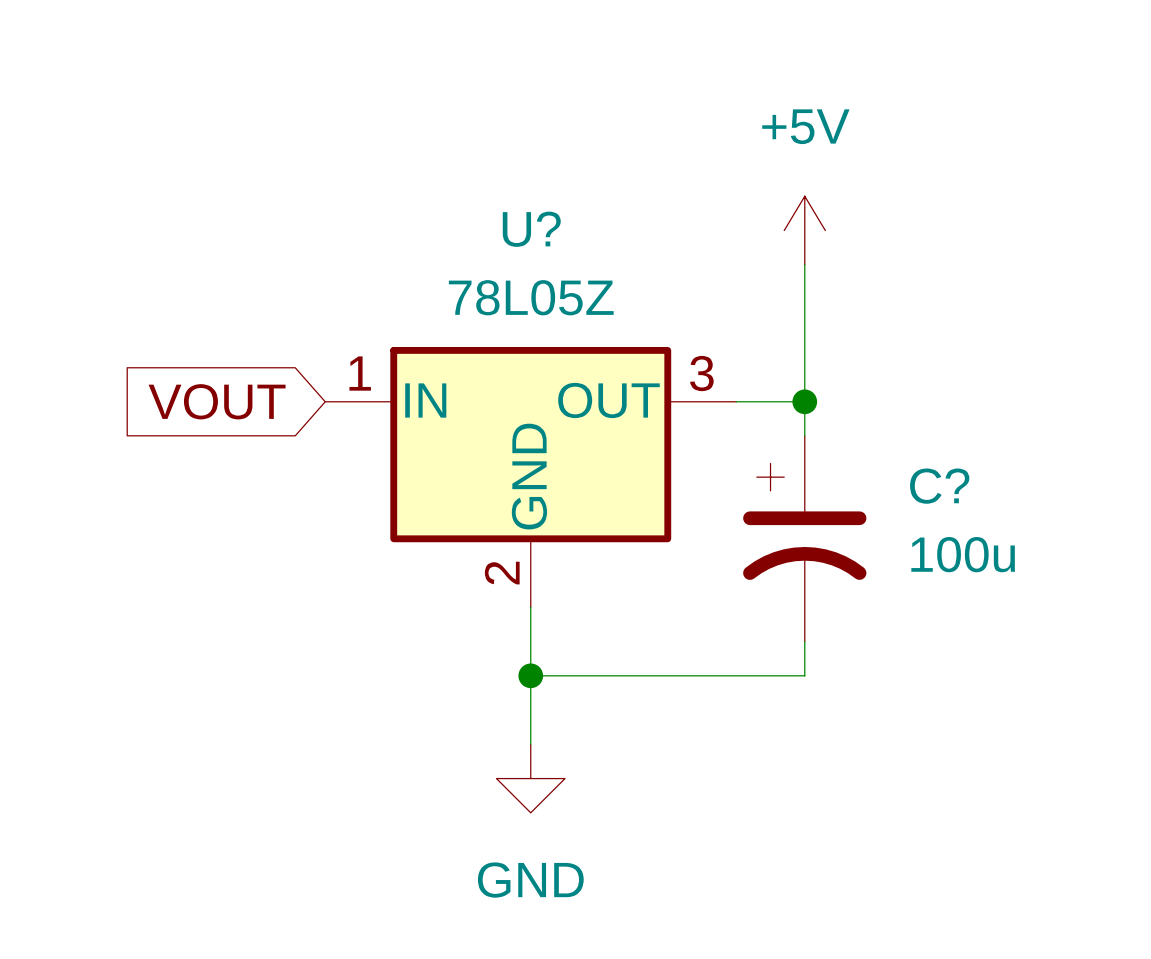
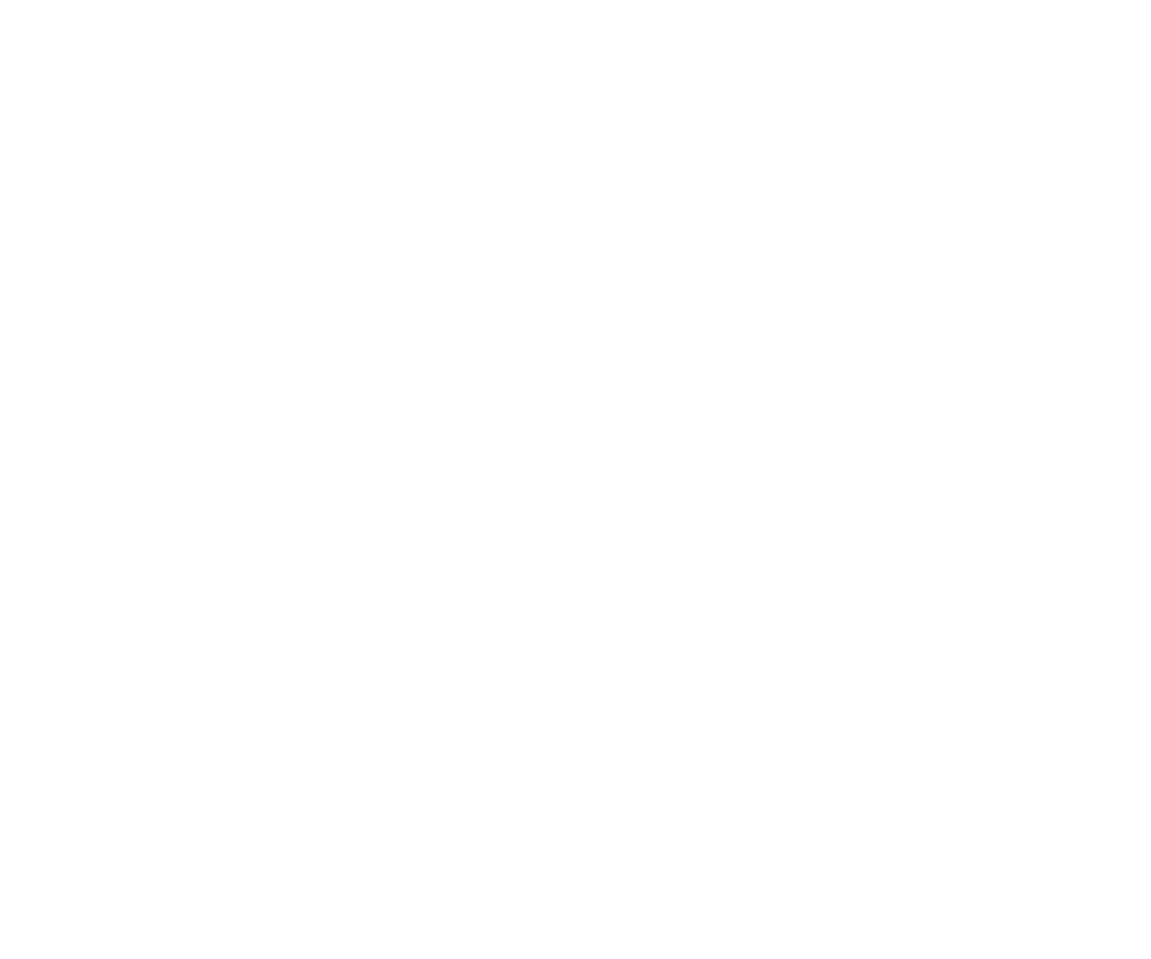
power symbol: +5V (804, 230) -> none
wire: (804, 264) (804, 436) -> none
global label: VOUT (217, 401) -> none
wire: (736, 401) (804, 401) -> none
junction: (804, 401) -> none
U?: 78L05Z (530, 477) -> none
C?: 100u (804, 538) -> none
wire: (530, 607) (530, 744) -> none
wire: (804, 641) (804, 675) (530, 675) -> none
junction: (530, 675) -> none
power symbol: GND (530, 778) -> none

